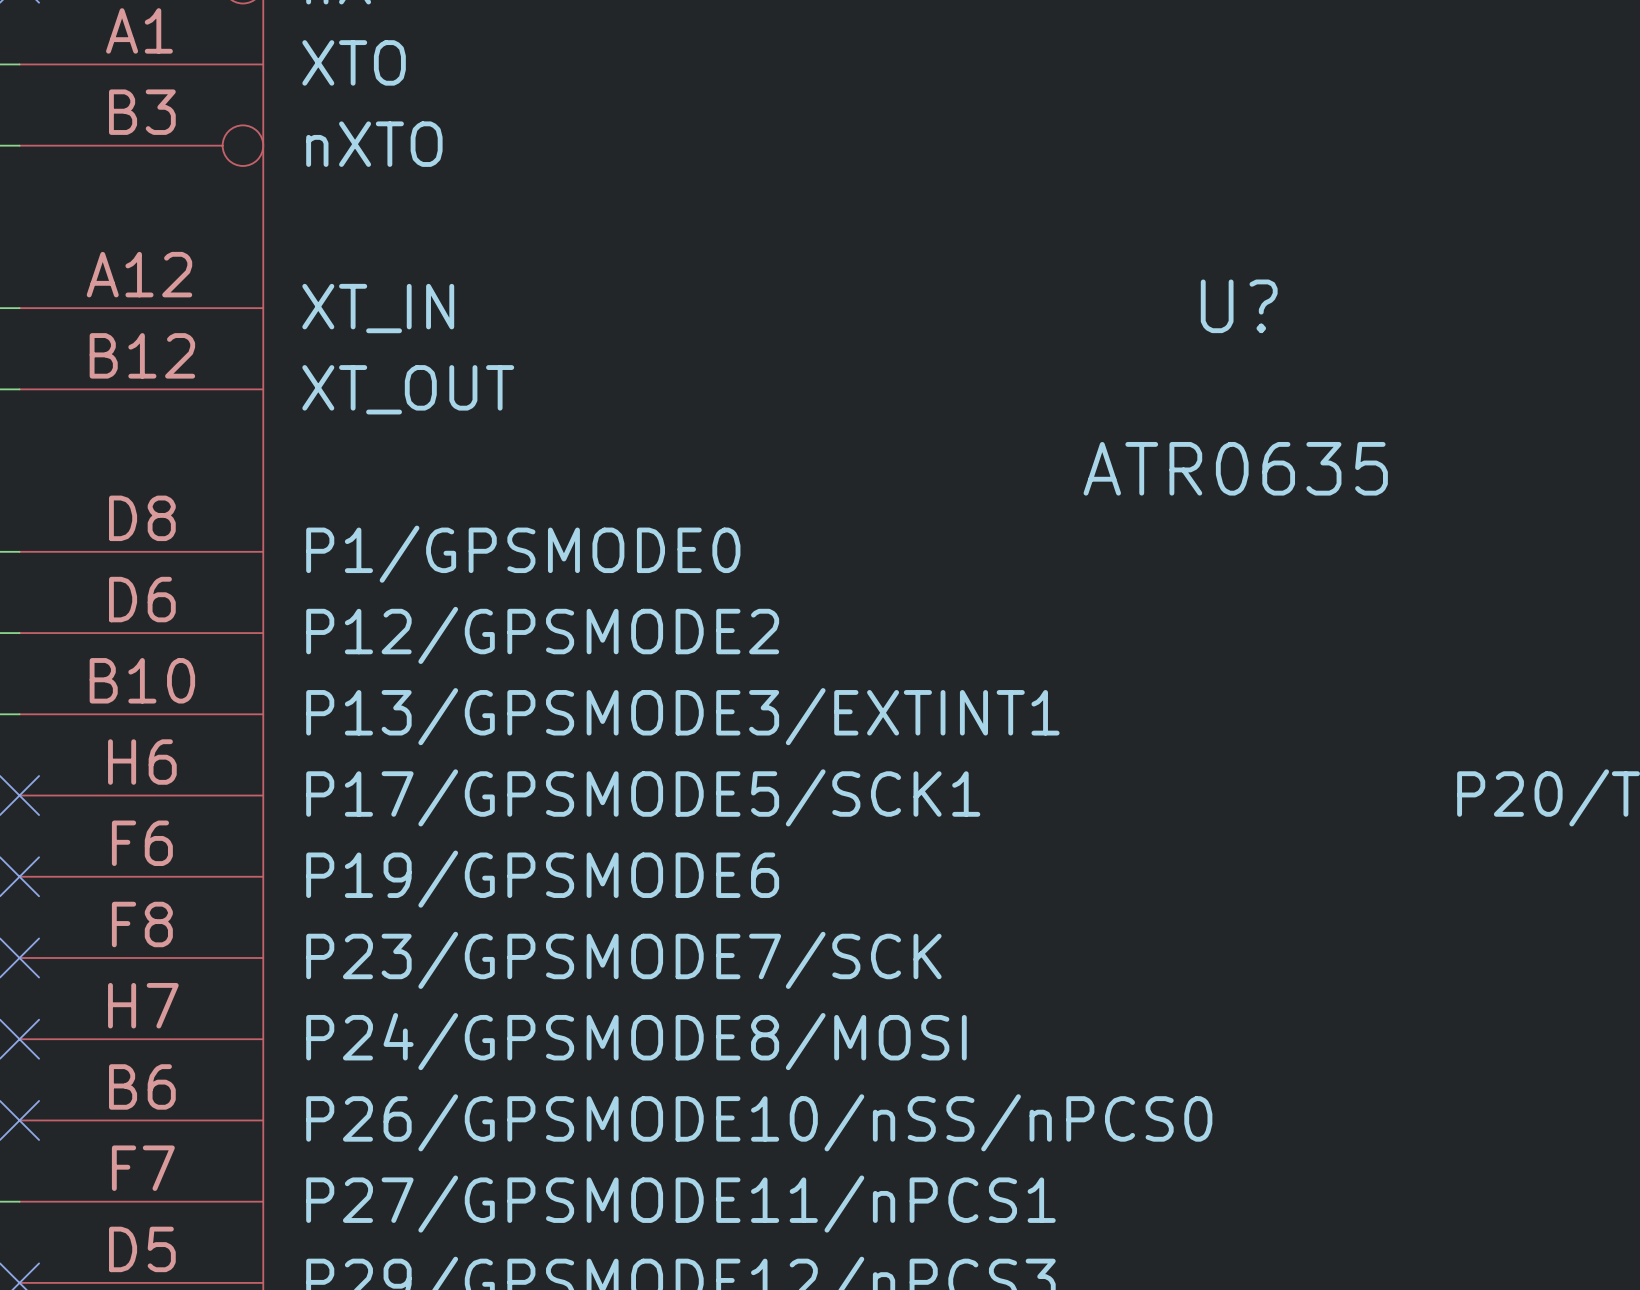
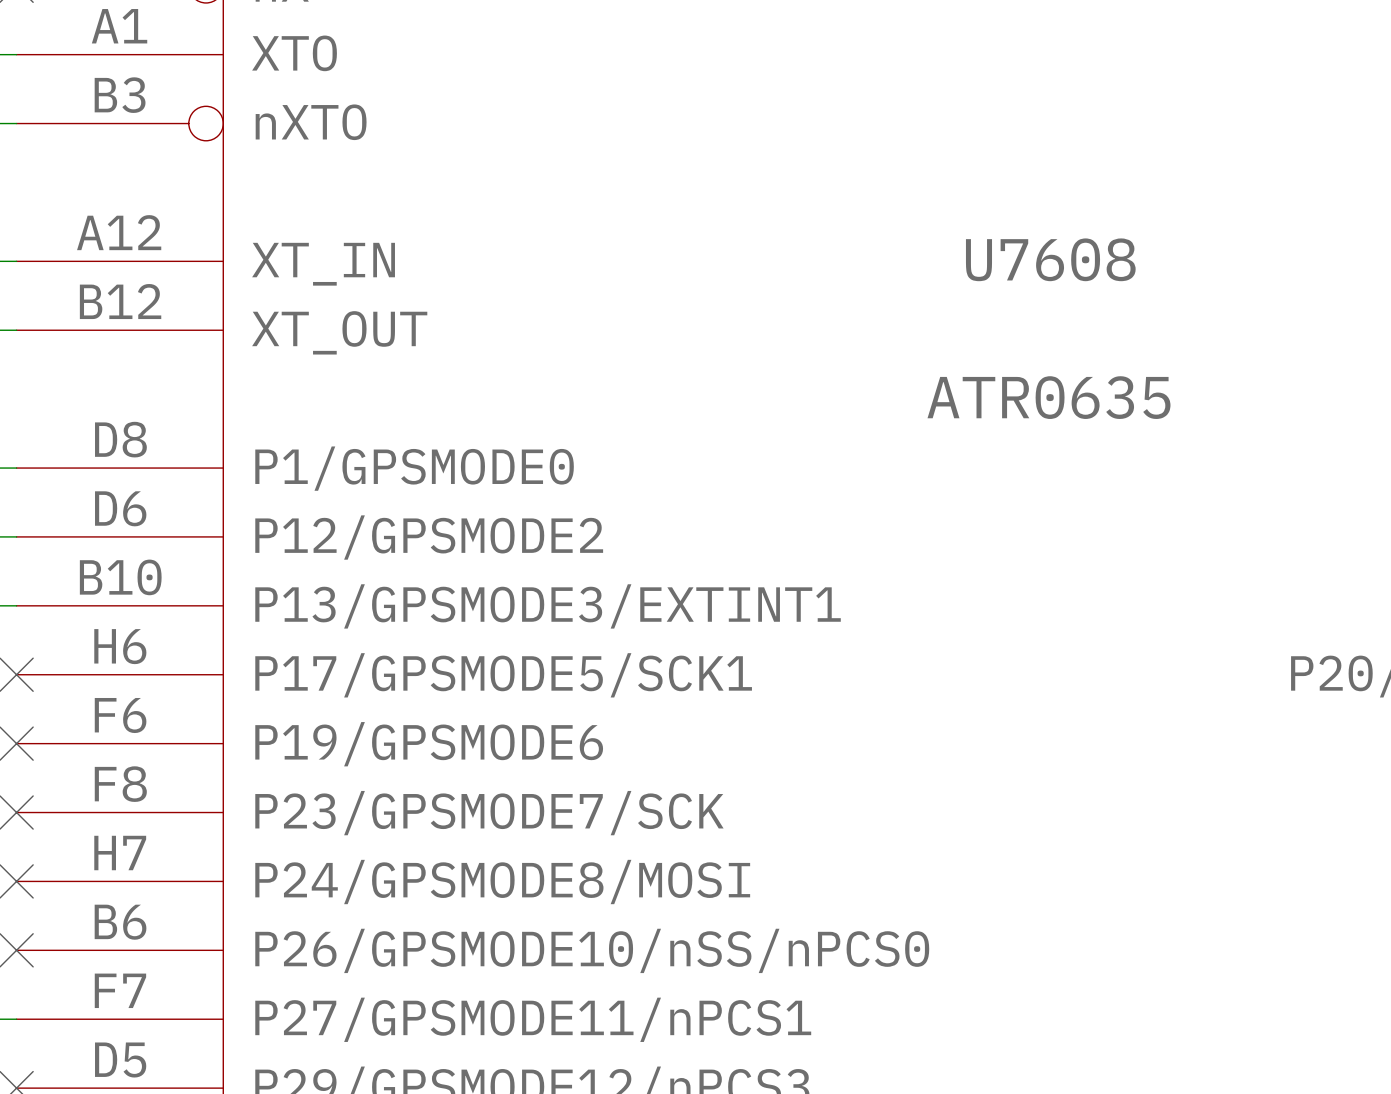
U? name: U? (1239, 306) -> U7608 (1050, 259)

